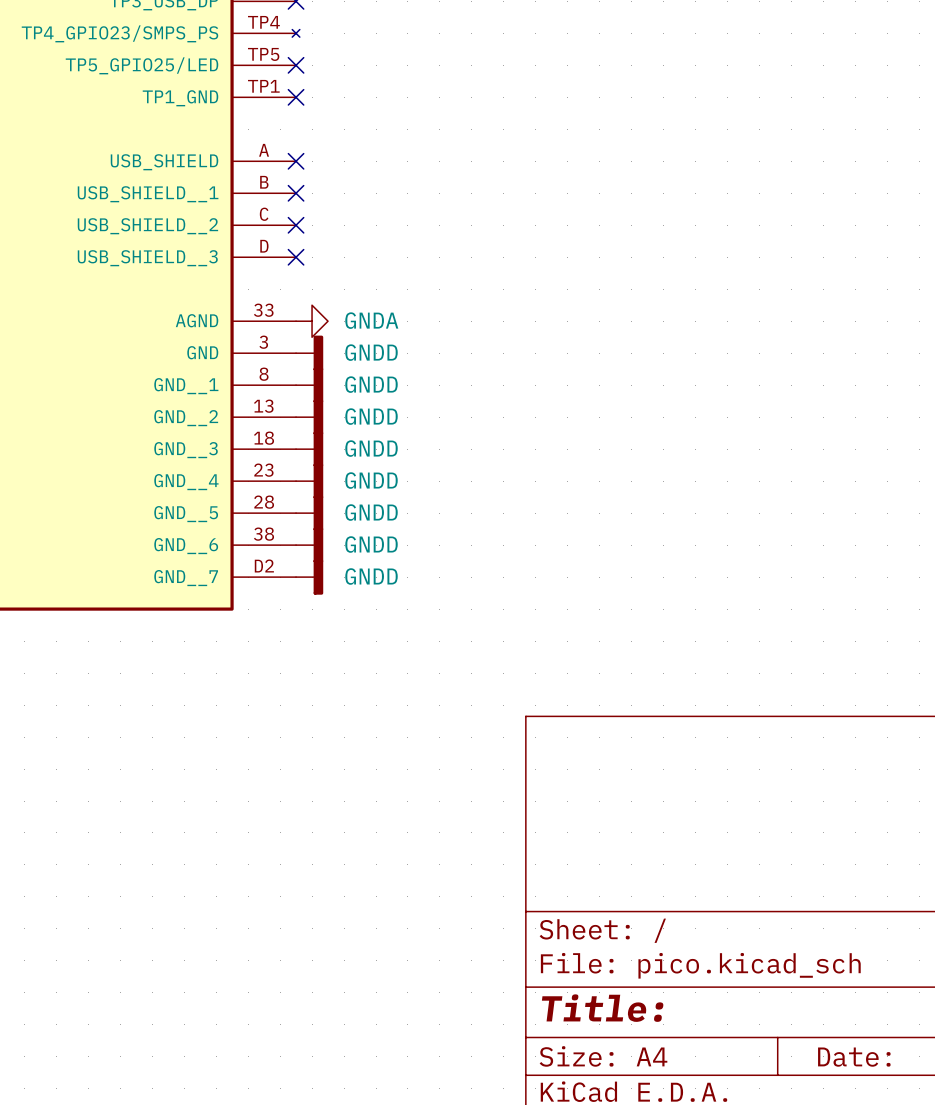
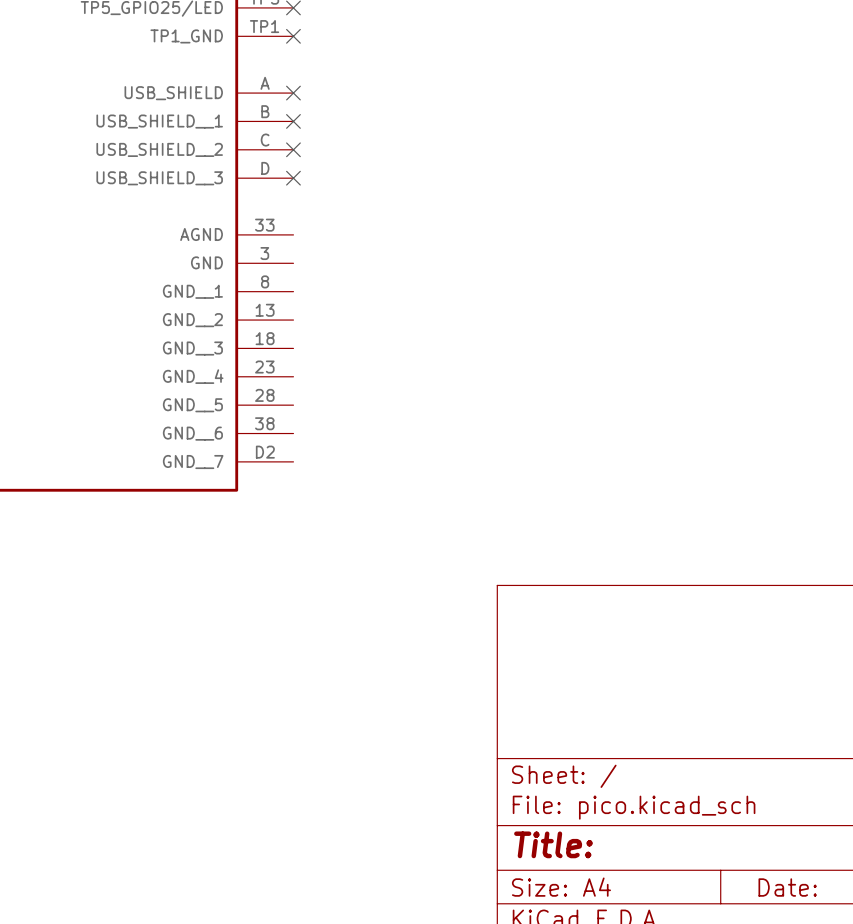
power symbol: GNDA (312, 321) -> none
power symbol: GNDD (309, 353) -> none
power symbol: GNDD (309, 385) -> none
power symbol: GNDD (309, 417) -> none
power symbol: GNDD (309, 449) -> none
power symbol: GNDD (309, 481) -> none
power symbol: GNDD (309, 513) -> none
power symbol: GNDD (309, 545) -> none
power symbol: GNDD (309, 577) -> none

